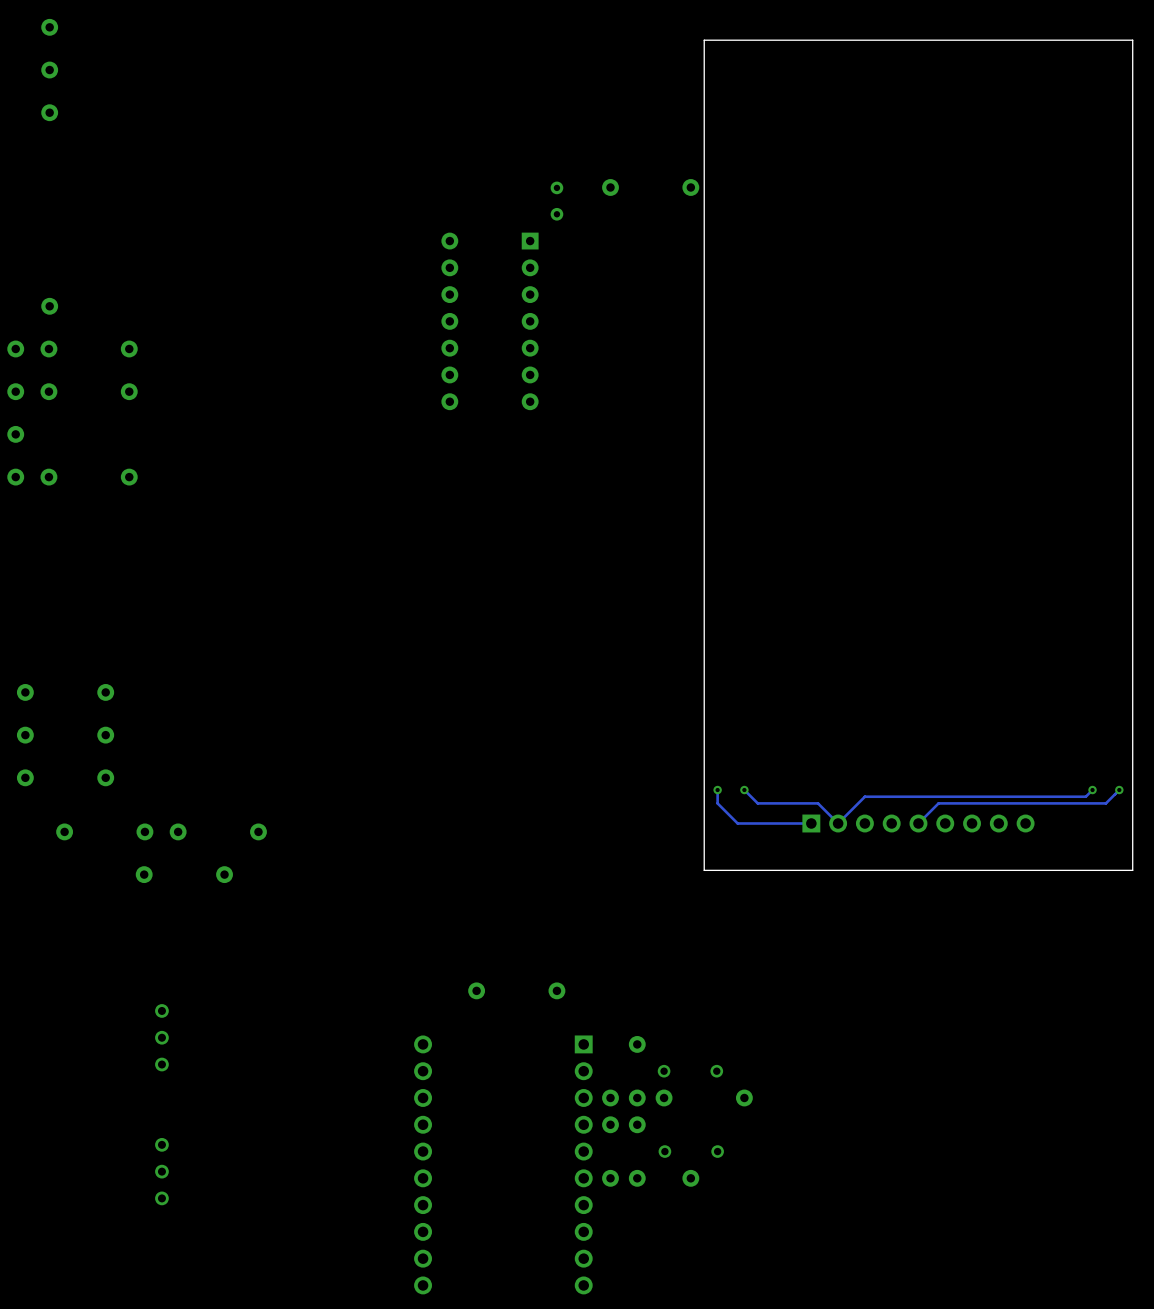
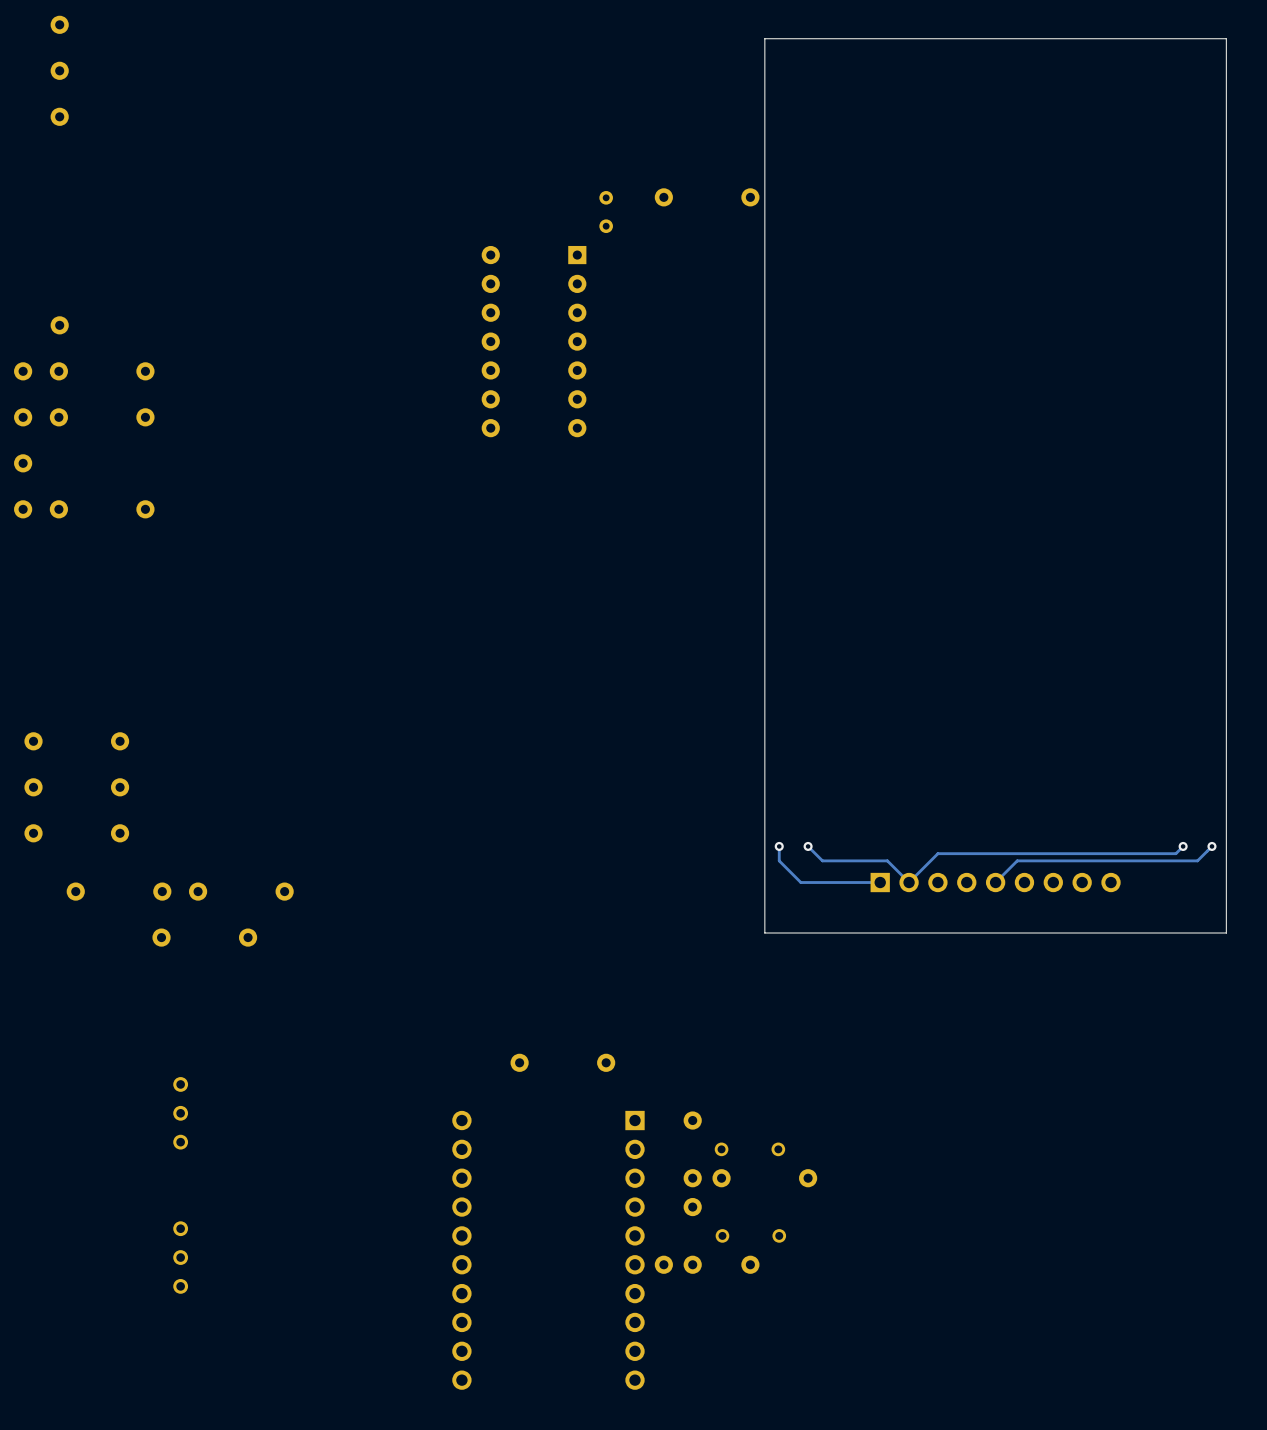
part: (610, 1111) -> none

